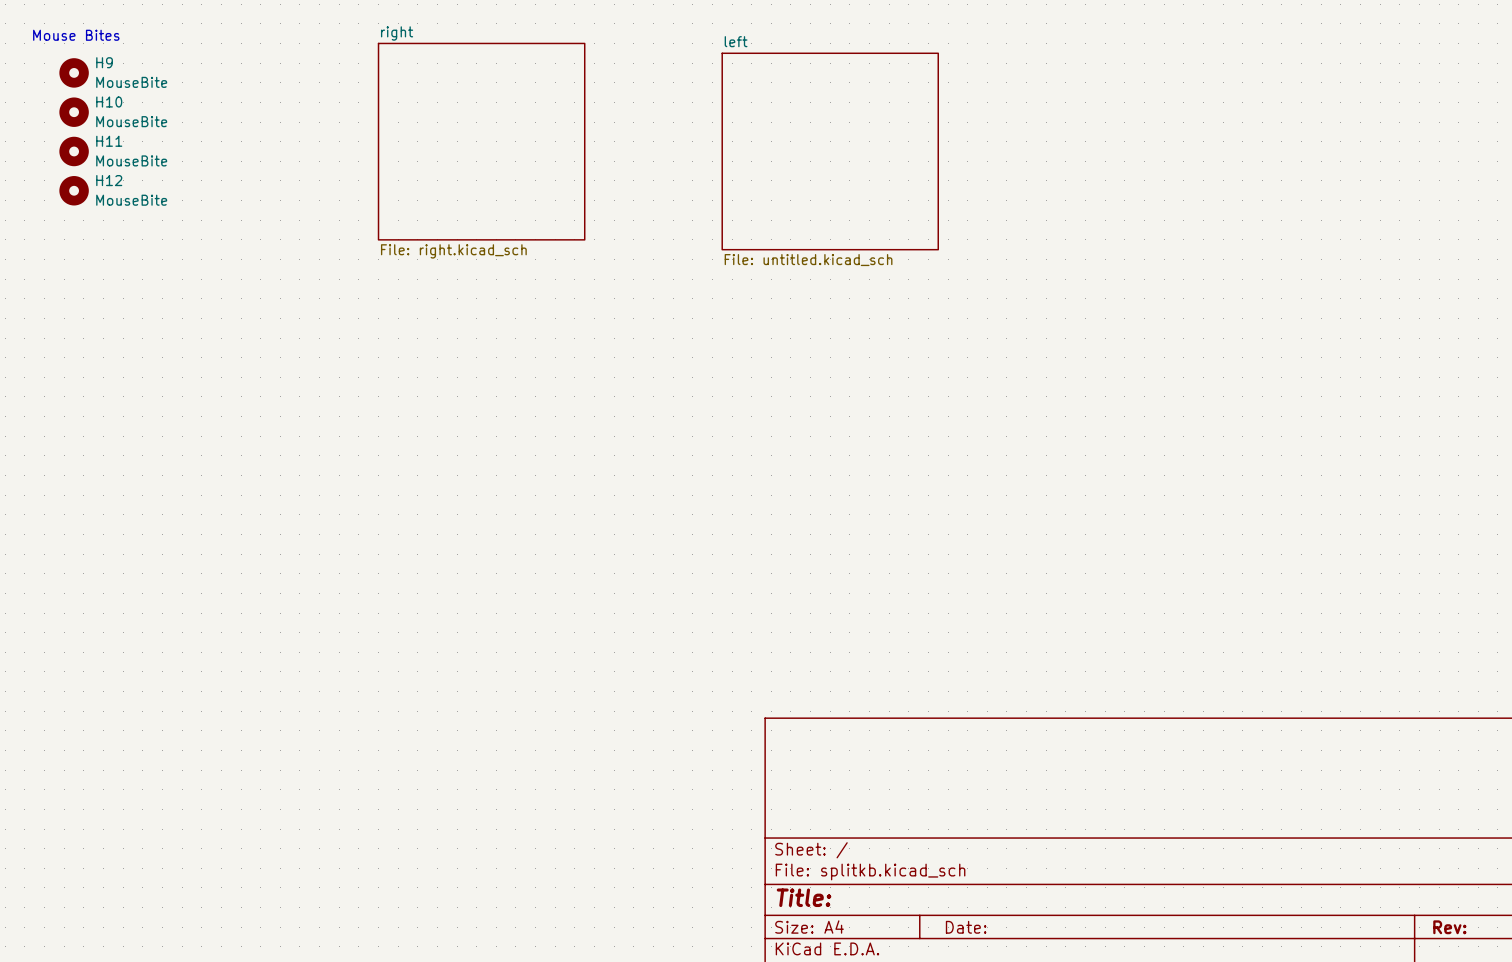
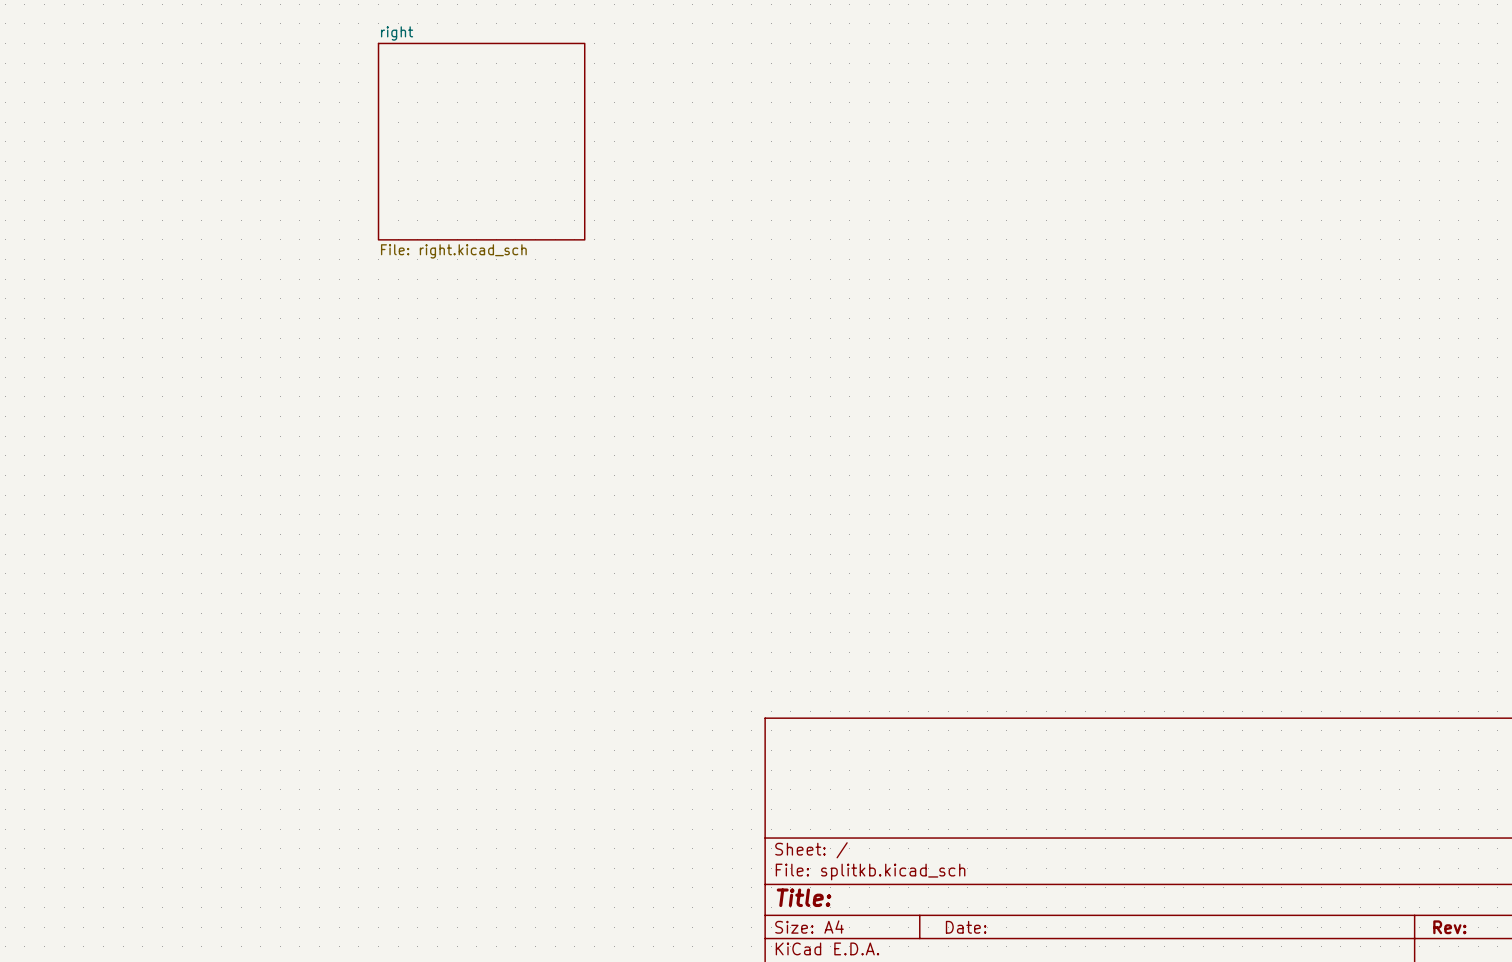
text: Mouse Bites (76, 35) -> none
H9: MouseBite (74, 72) -> none
H10: MouseBite (74, 112) -> none
H11: MouseBite (74, 151) -> none
sheet left: File: untitled.kicad_sch (830, 151) -> none
H12: MouseBite (74, 190) -> none

